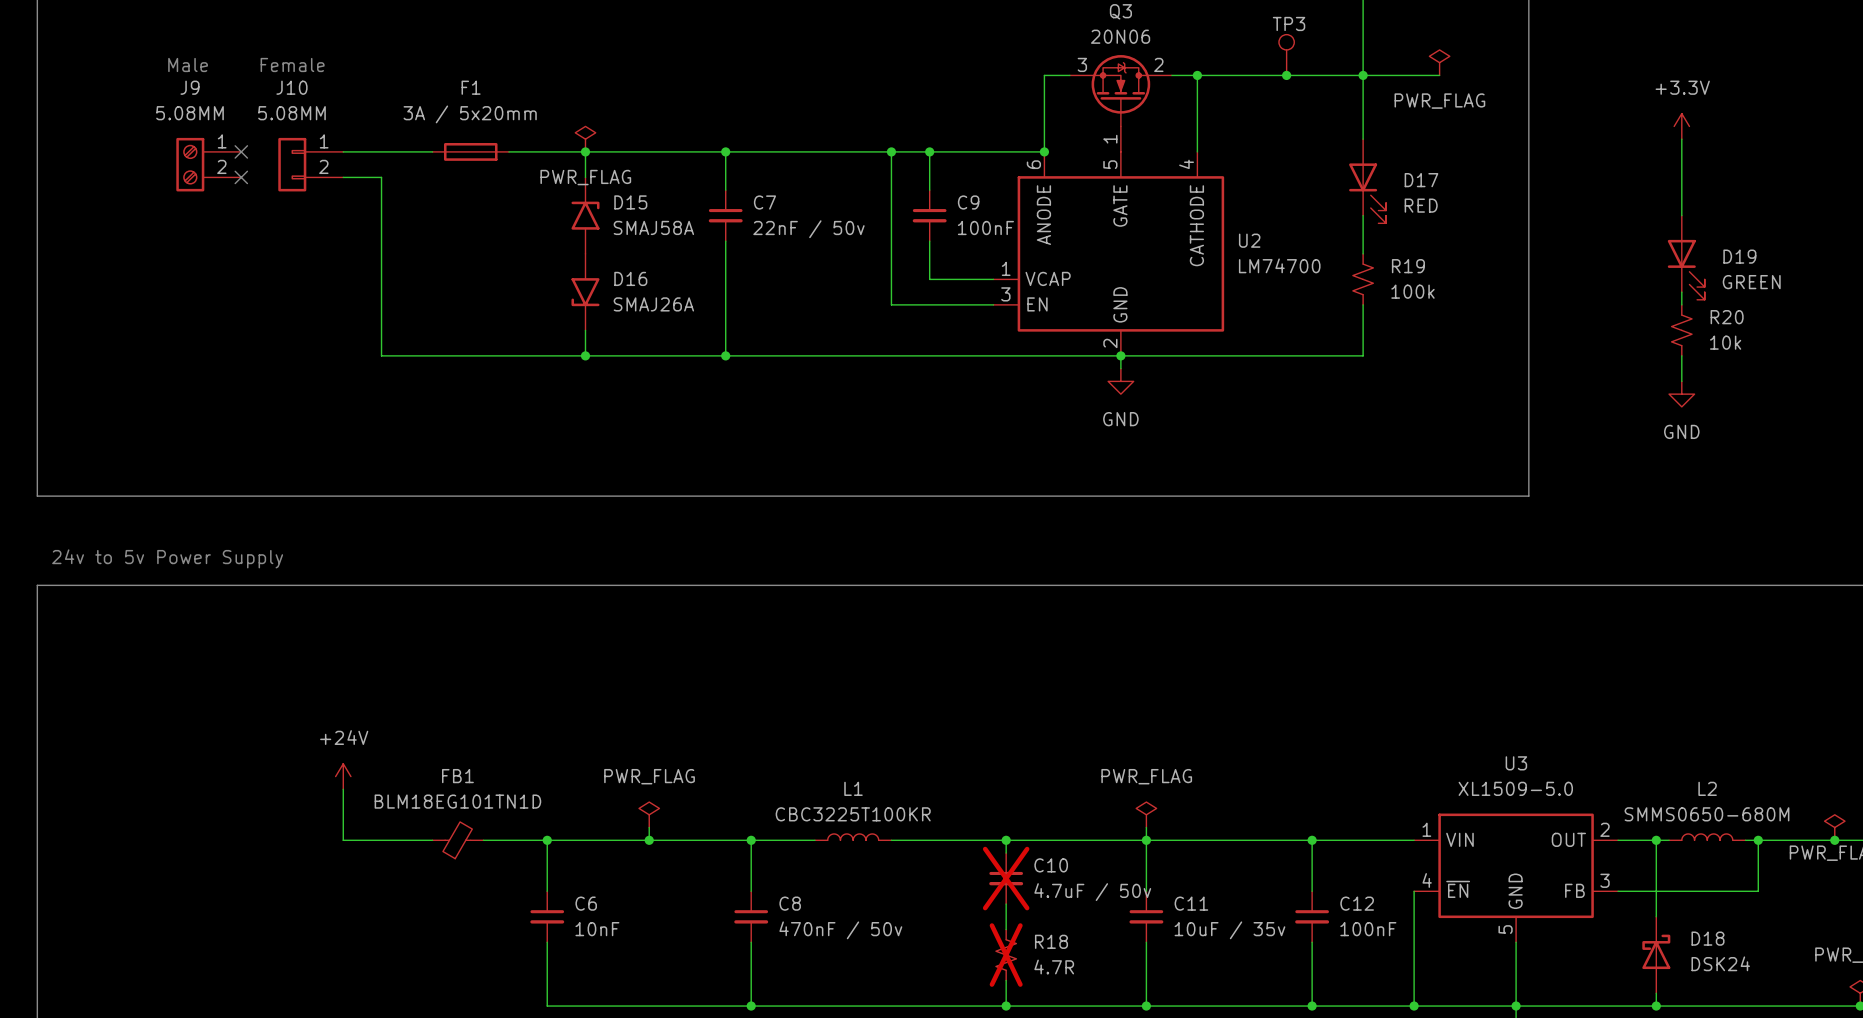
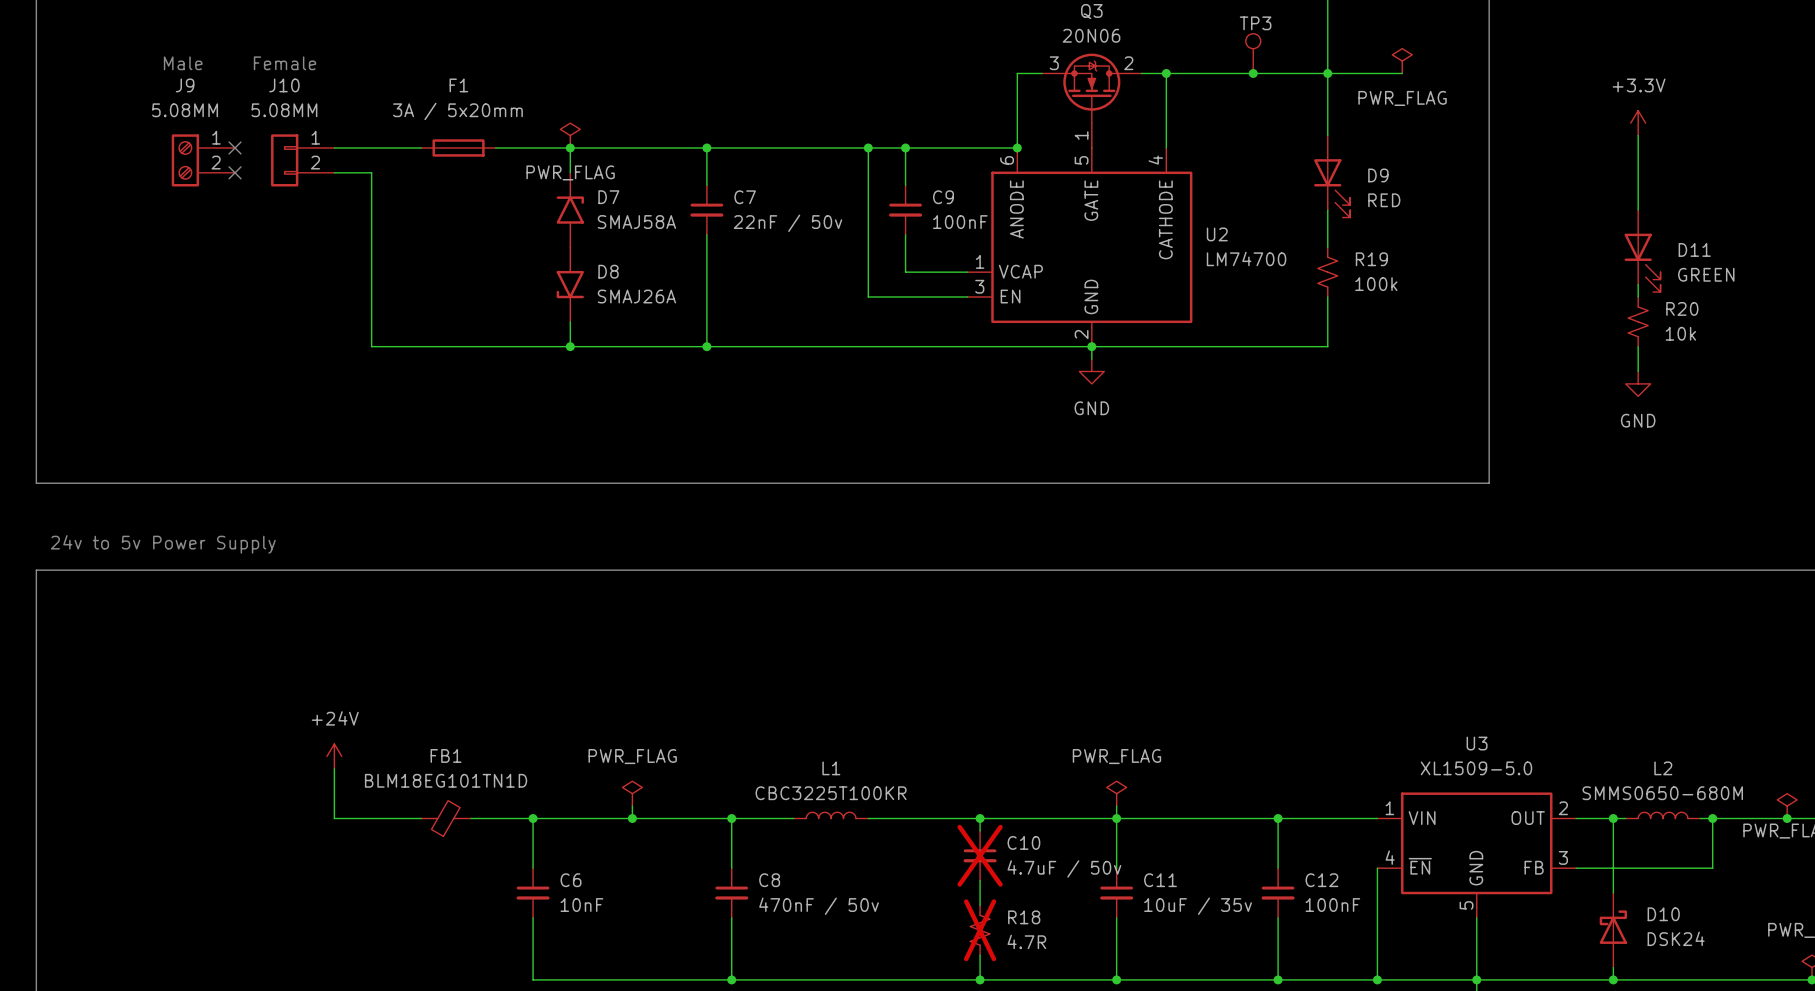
D17 name: D17 (1421, 180) -> D9 (1378, 175)
D15 name: D15 (630, 202) -> D7 (608, 197)
D19 name: D19 (1739, 256) -> D11 (1694, 249)
D16 name: D16 (630, 278) -> D8 (608, 271)
D18 name: D18 (1708, 938) -> D10 (1663, 914)

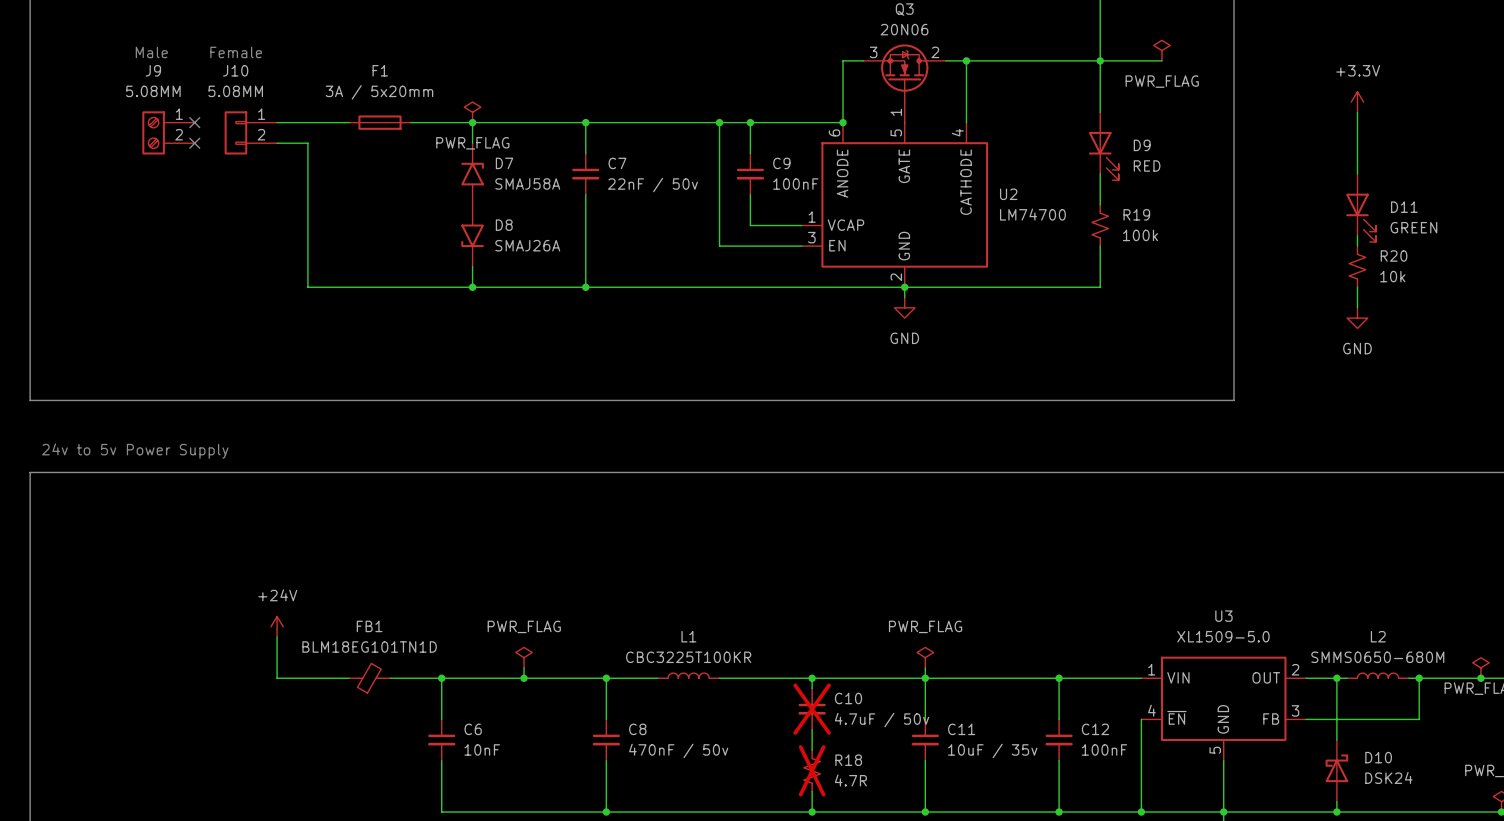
TP3: (1253, 53) -> none
junction: (1253, 73) -> none

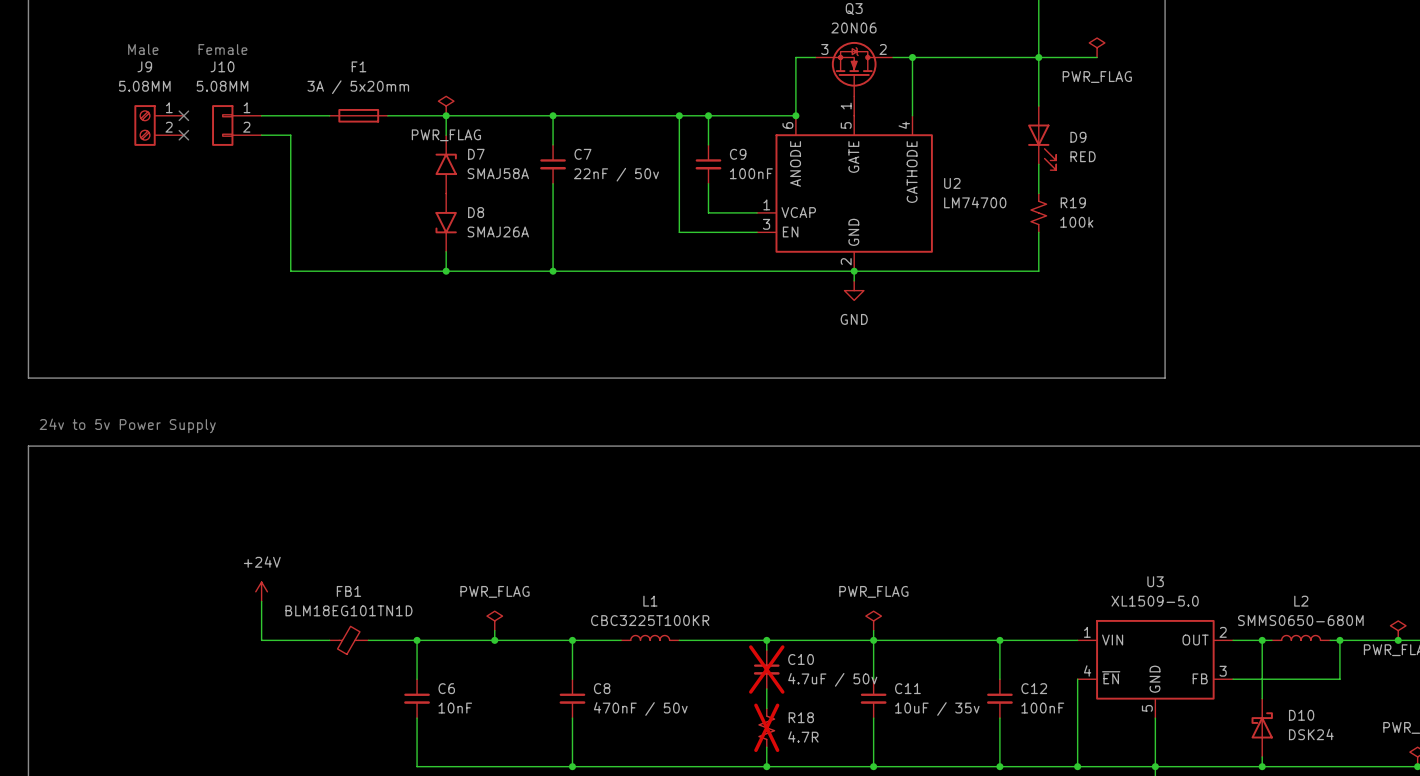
power symbol: +3.3V (1357, 102) -> none
wire: (1357, 112) (1357, 174) -> none
D11: GREEN (1361, 208) -> none
wire: (1357, 235) (1357, 246) -> none
R20: 10k (1357, 266) -> none
wire: (1357, 287) (1357, 307) -> none
power symbol: GND (1357, 318) -> none

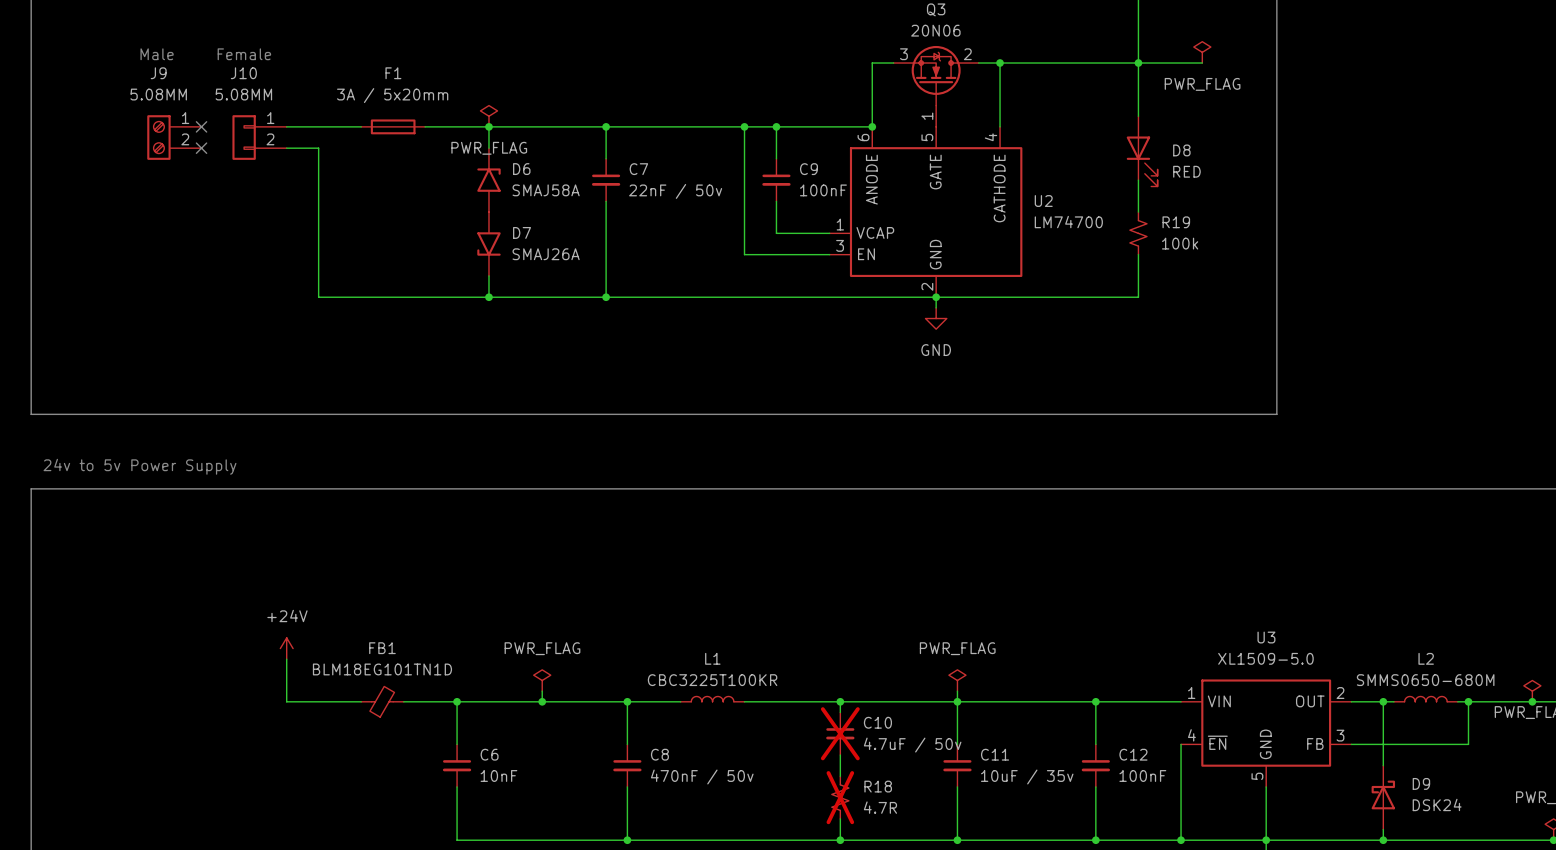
D9 name: D9 (1078, 137) -> D8 (1181, 150)
D7 name: D7 (476, 154) -> D6 (521, 169)
D8 name: D8 (476, 212) -> D7 (522, 232)
D10 name: D10 (1301, 715) -> D9 (1421, 783)

